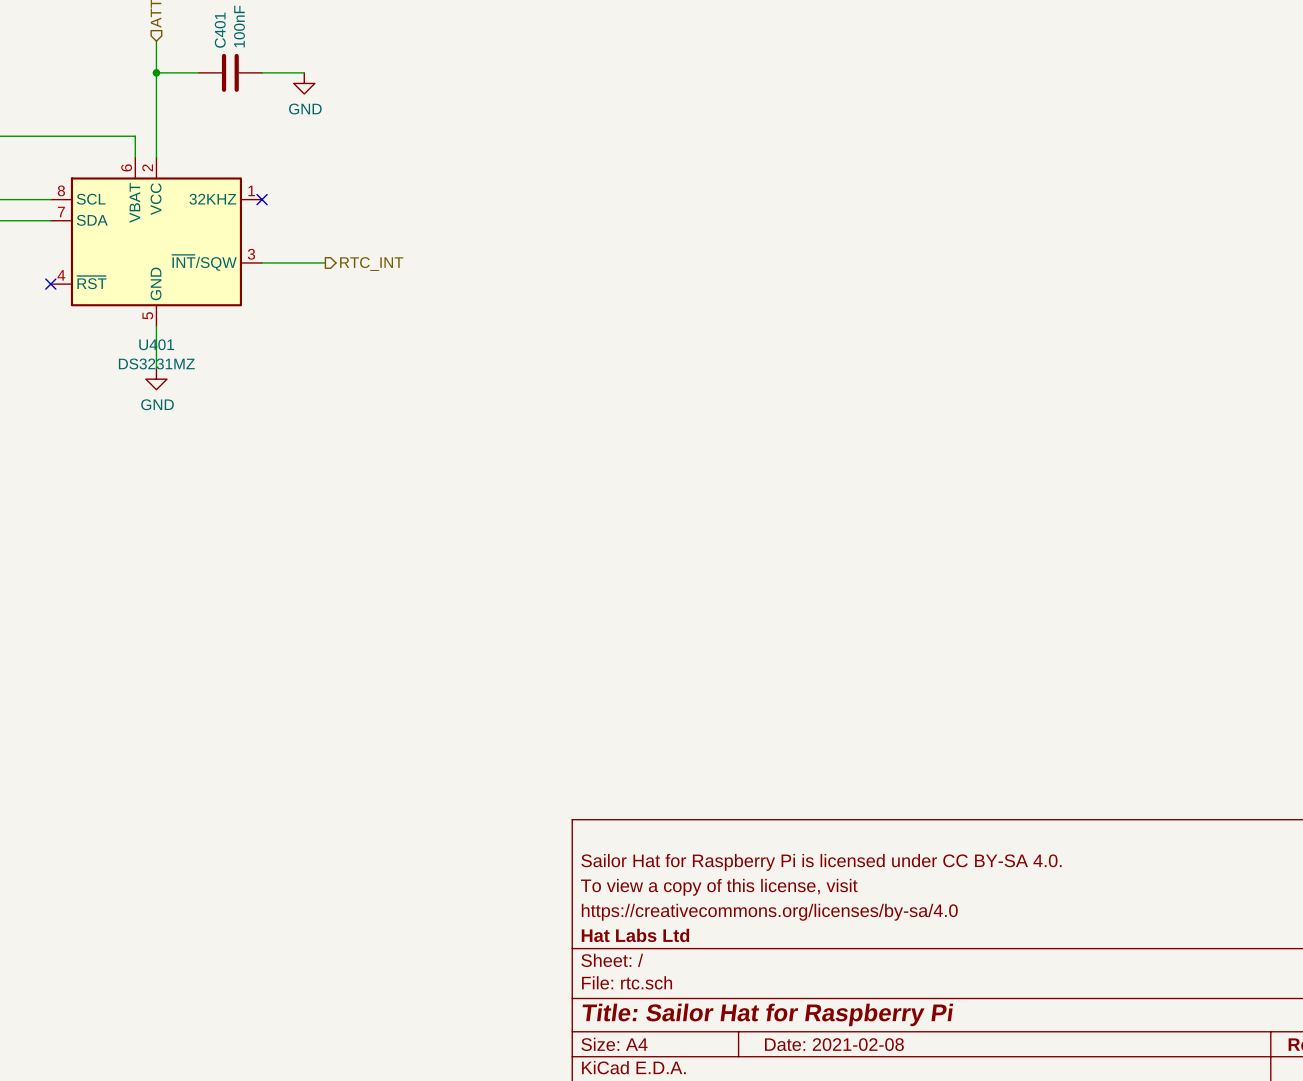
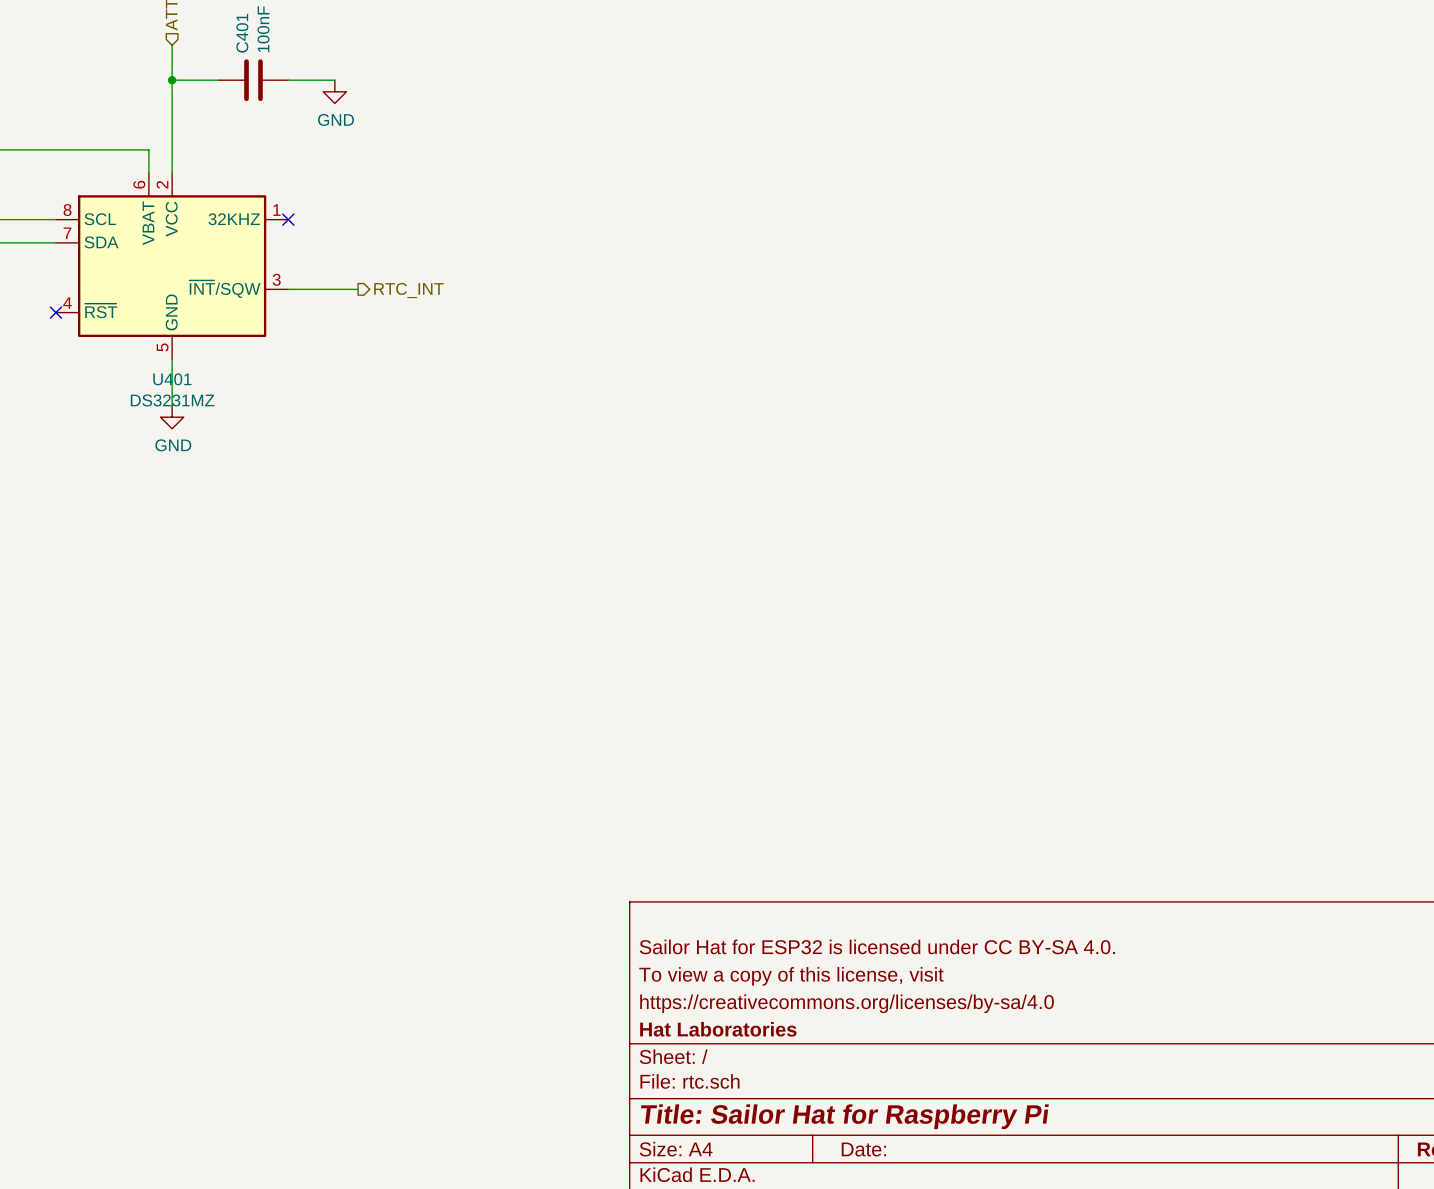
title block: Sailor Hat for Raspberry Pi is licensed under CC BY-SA 4.0. (821, 862) -> Sailor Hat for ESP32 is licensed under CC BY-SA 4.0. (877, 946)
title block: Hat Labs Ltd (635, 935) -> Hat Laboratories (718, 1029)
title block: Date: 2021-02-08 (834, 1044) -> Date: (863, 1149)

